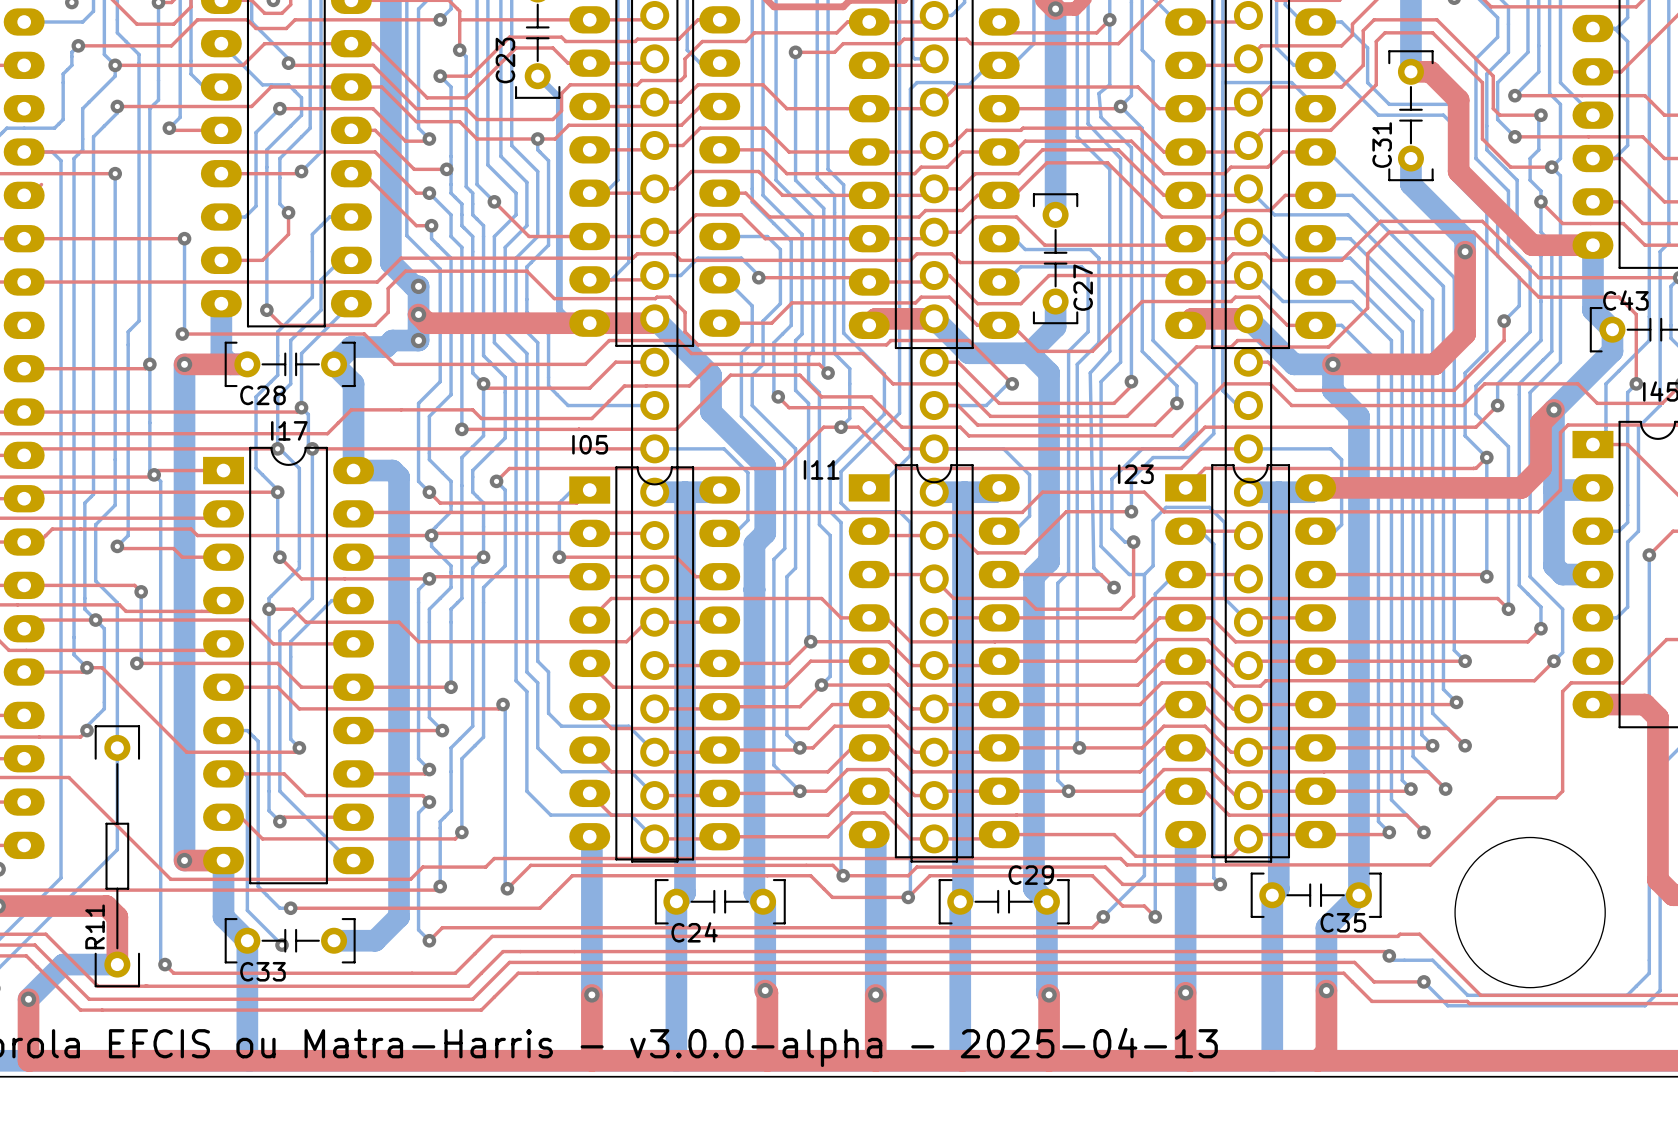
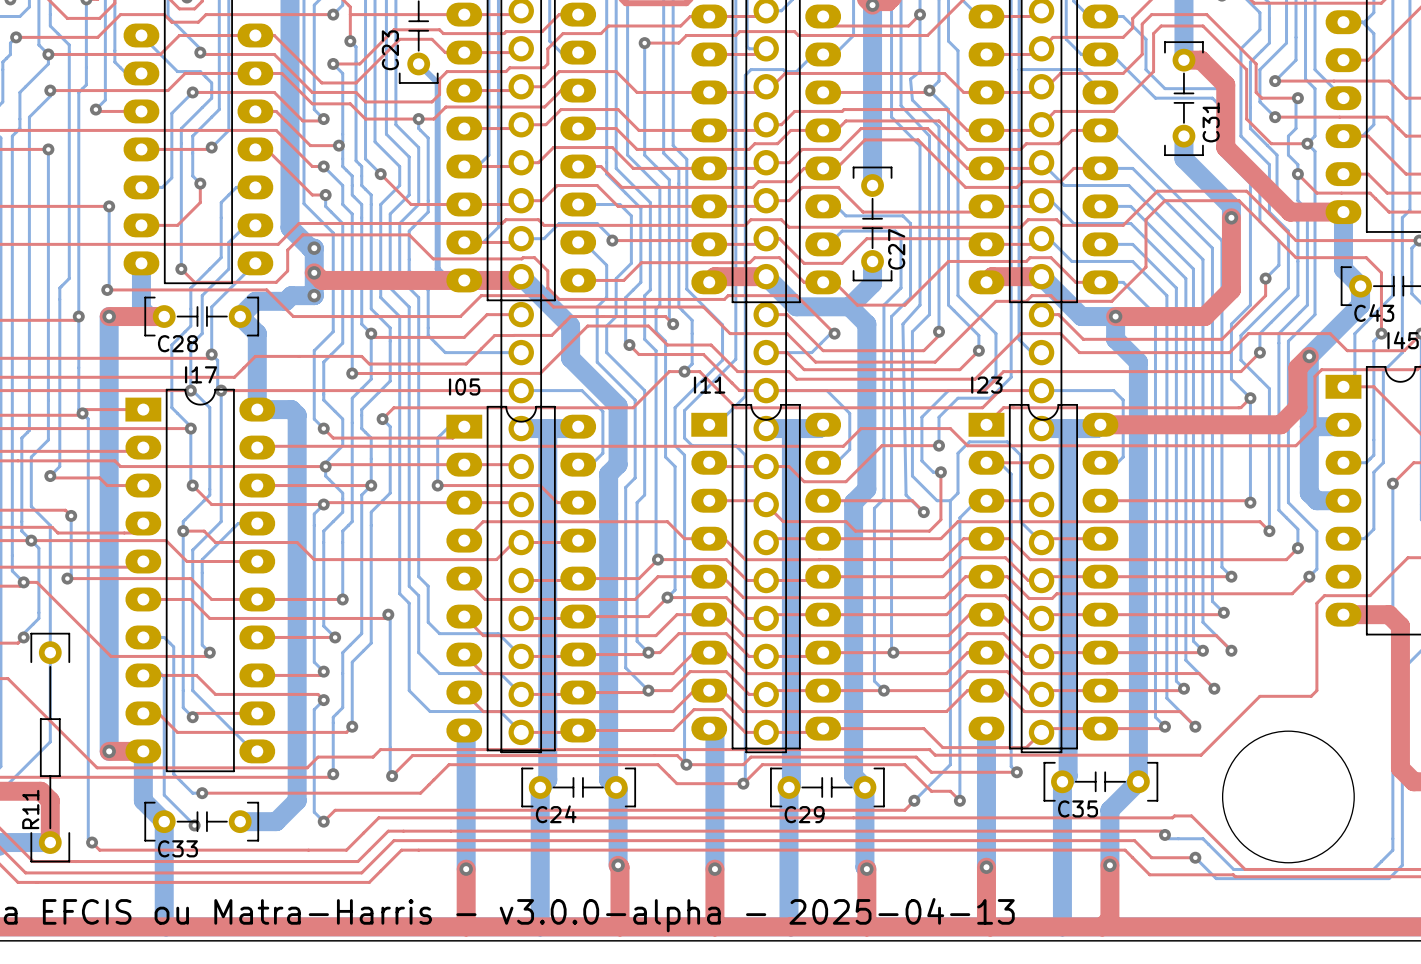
C31 name position: C31 (1382, 145) -> C31 (1211, 122)
C43 name position: C43 (1625, 300) -> C43 (1374, 312)
I11 name position: I11 (821, 469) -> I11 (709, 385)
I23 name position: I23 (1135, 474) -> I23 (986, 385)
C29 name position: C29 (1031, 875) -> C29 (804, 814)
C35 name position: C35 (1343, 922) -> C35 (1078, 808)

